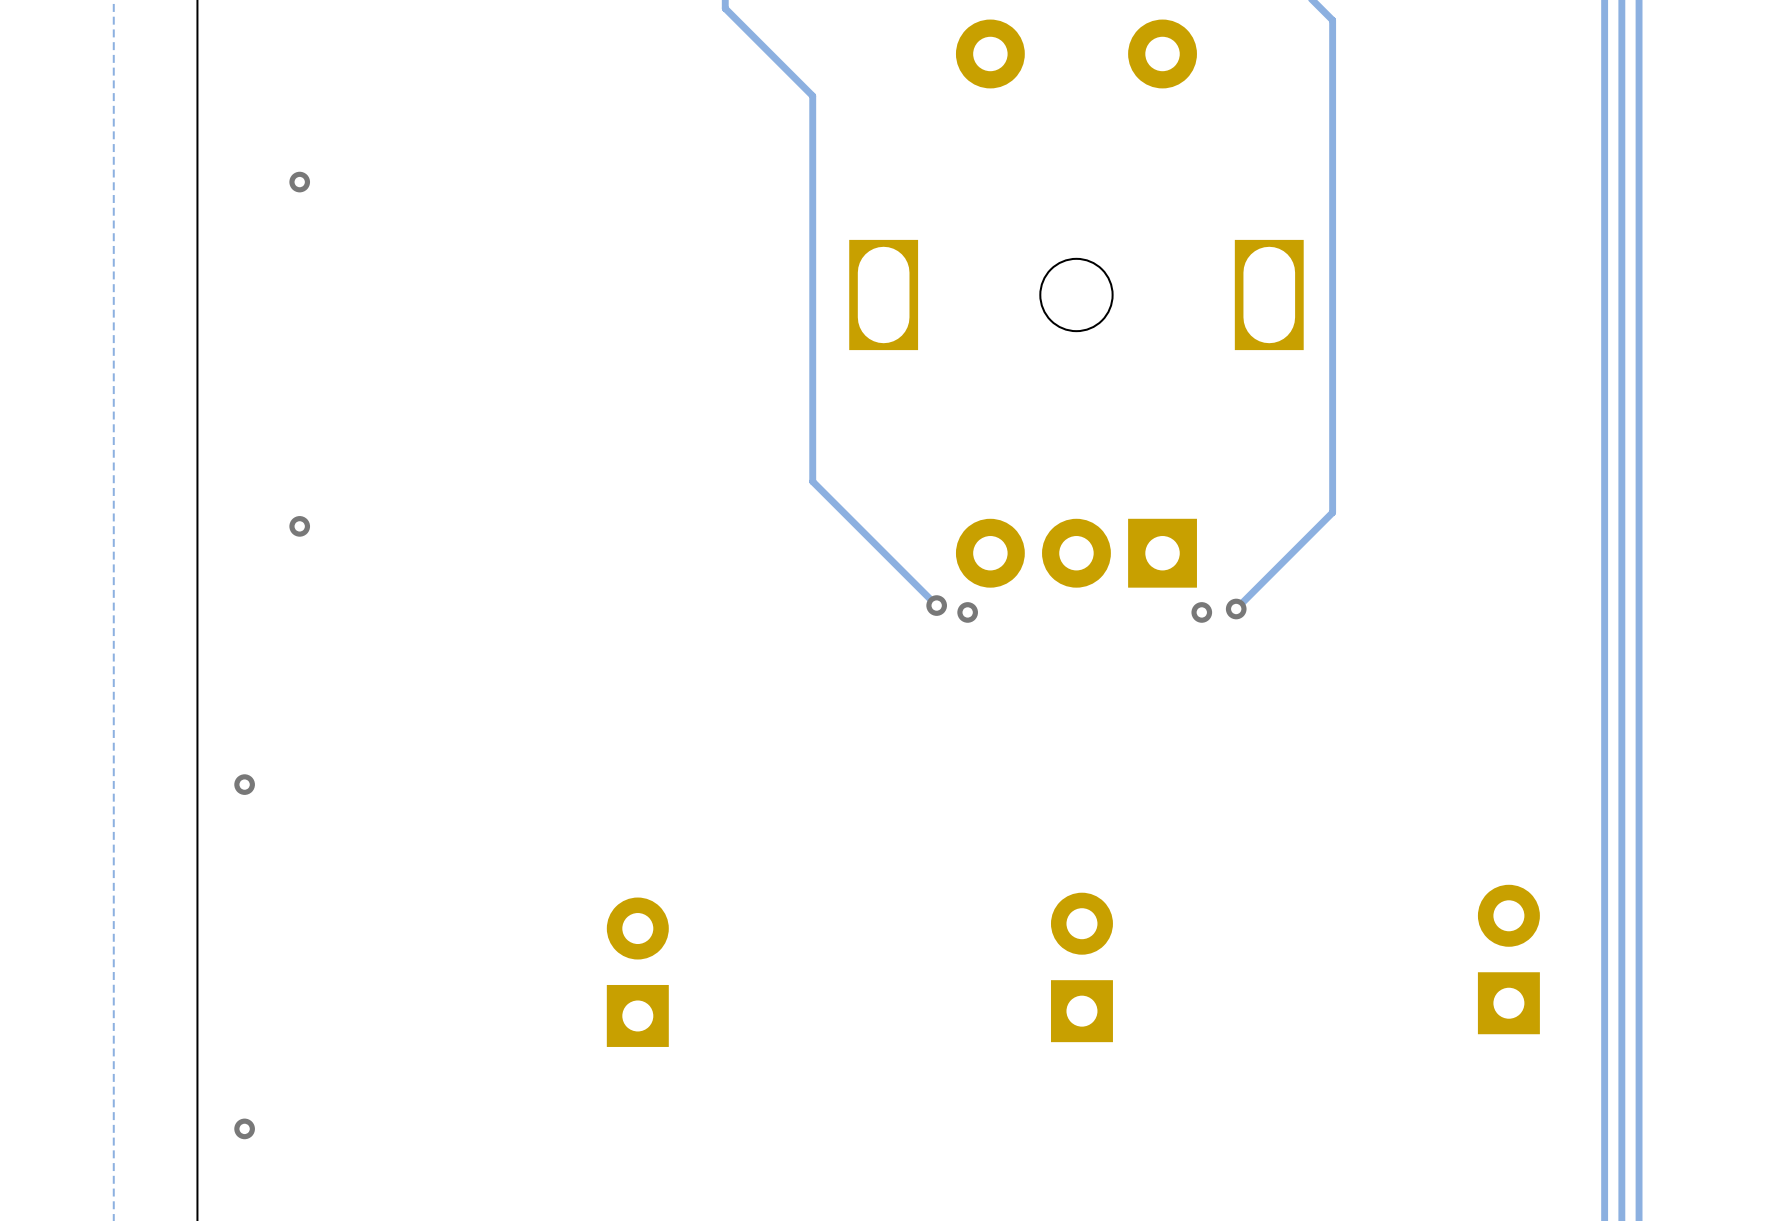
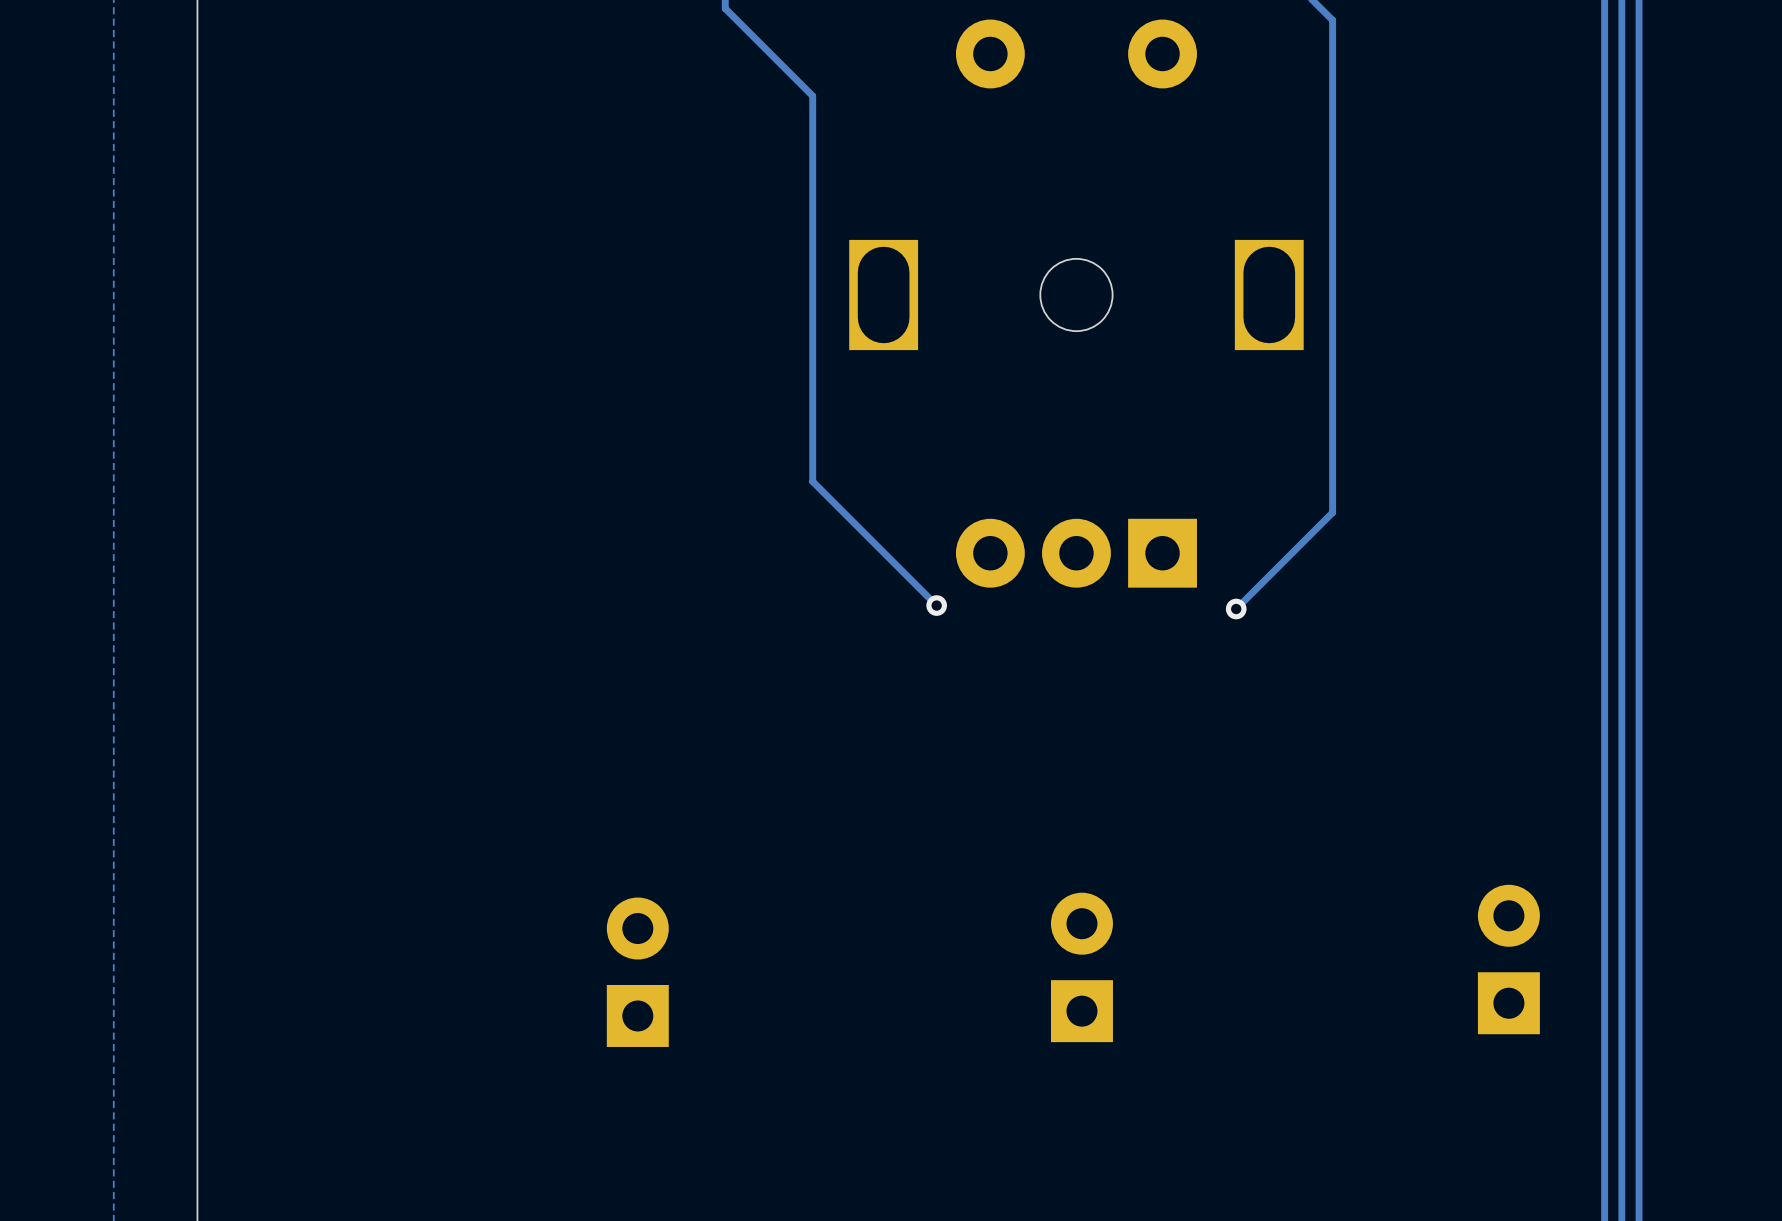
via: (299, 182) -> none
via: (299, 526) -> none
via: (967, 612) -> none
via: (1201, 612) -> none
via: (244, 784) -> none
via: (244, 1128) -> none

